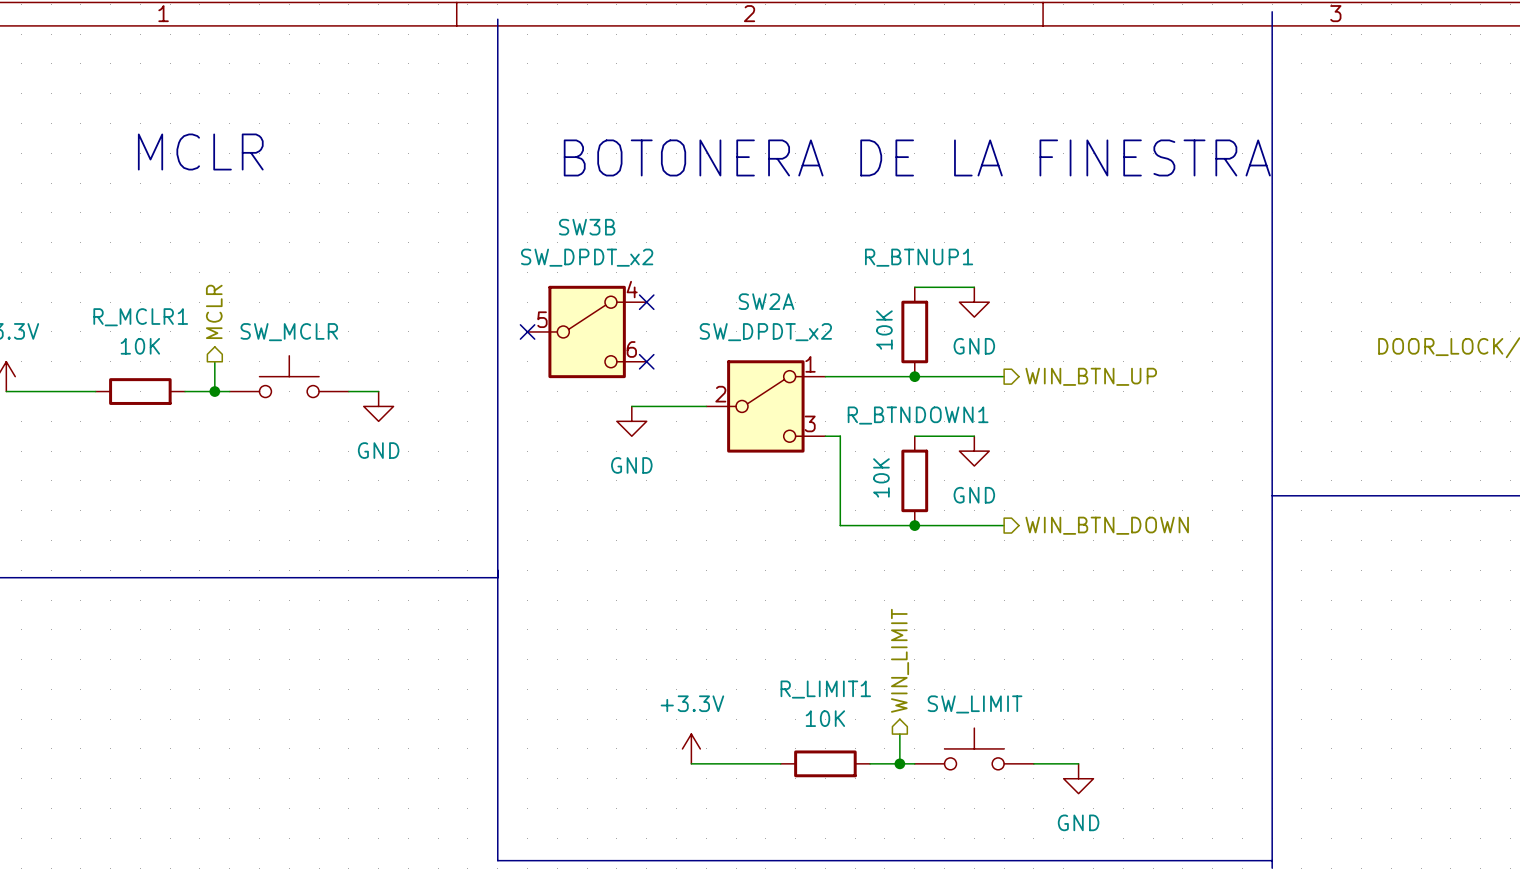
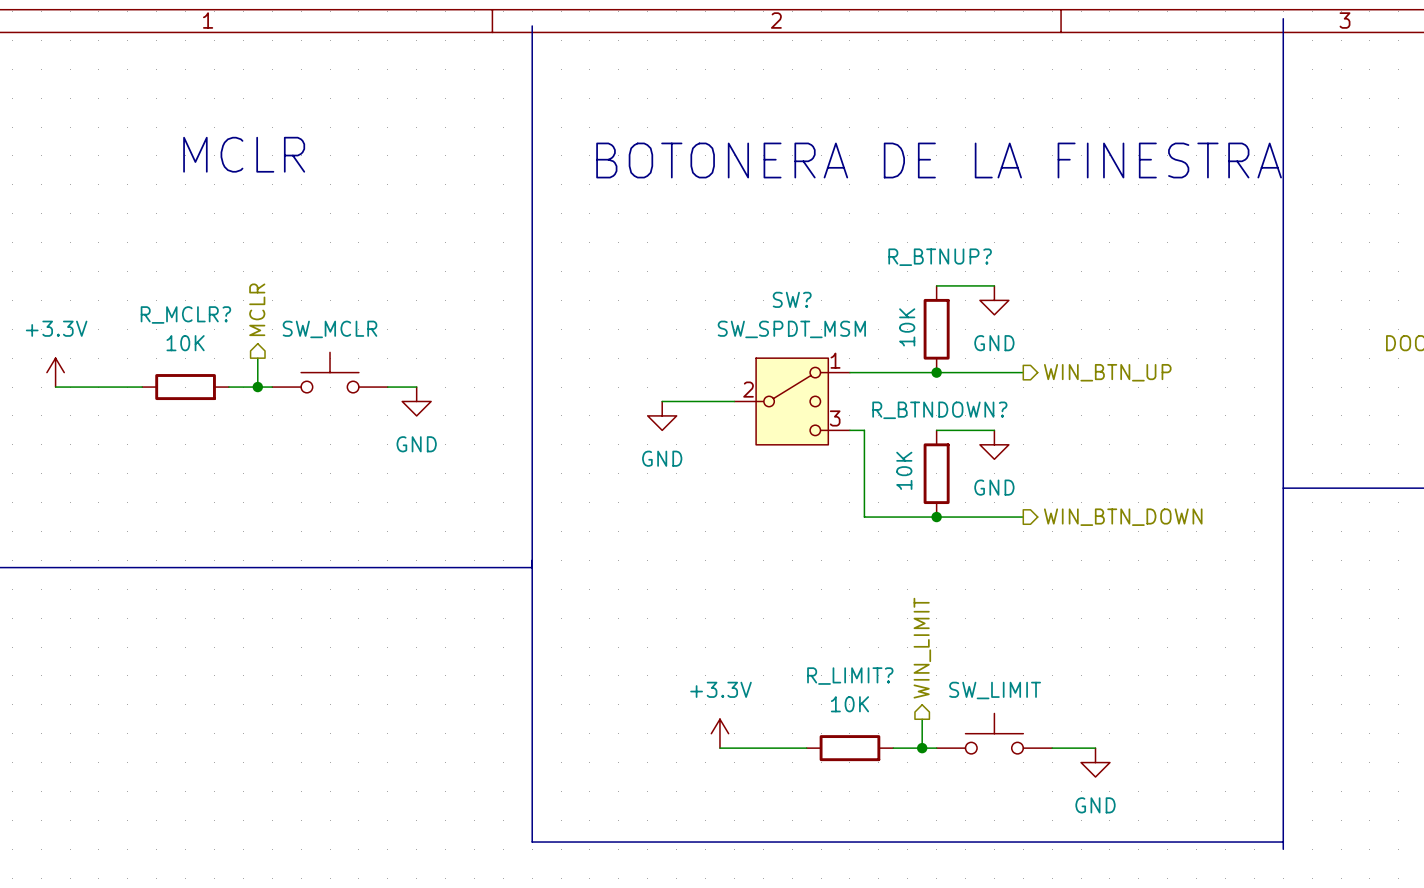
R_BTNUP1 name: R_BTNUP1 (919, 257) -> R_BTNUP? (940, 257)
no-connect mark: (646, 302) -> none
R_MCLR1 name: R_MCLR1 (140, 317) -> R_MCLR? (185, 314)
no-connect mark: (527, 331) -> none
SW3B: SW_DPDT_x2 (587, 331) -> none
no-connect mark: (646, 361) -> none
SW2A: SW_DPDT_x2 (765, 406) -> none
SW?: none -> SW_SPDT_MSM (792, 401)
R_BTNDOWN1 name: R_BTNDOWN1 (918, 415) -> R_BTNDOWN? (939, 410)
R_LIMIT1 name: R_LIMIT1 (825, 689) -> R_LIMIT? (850, 676)

